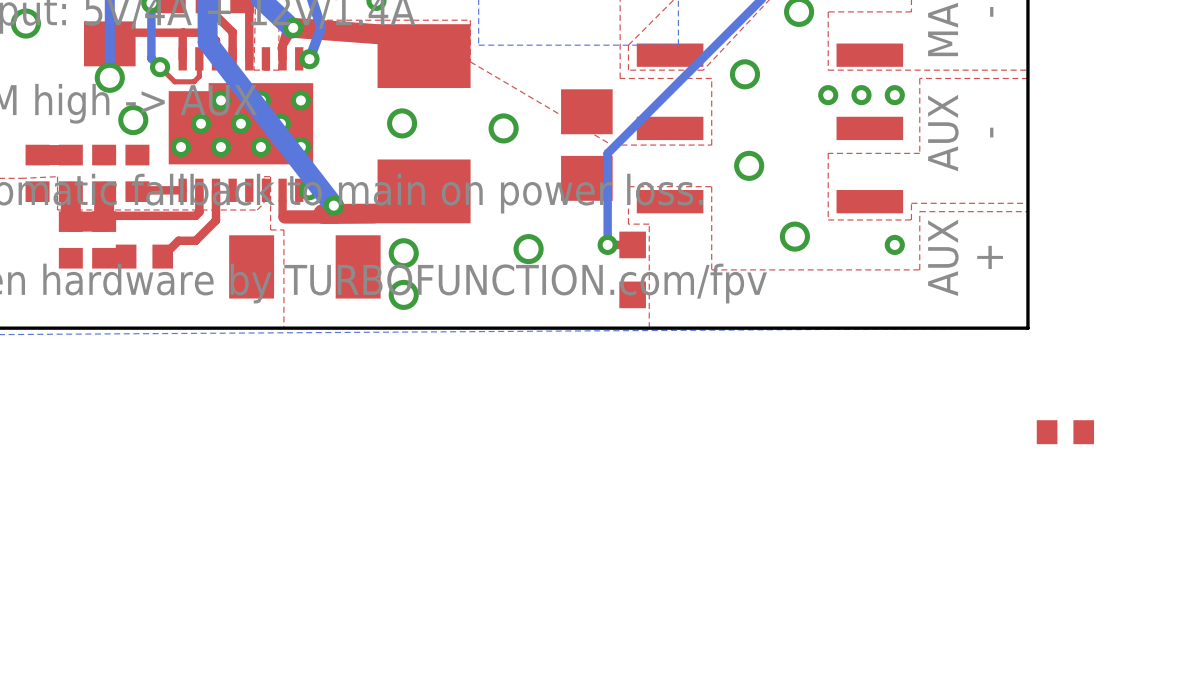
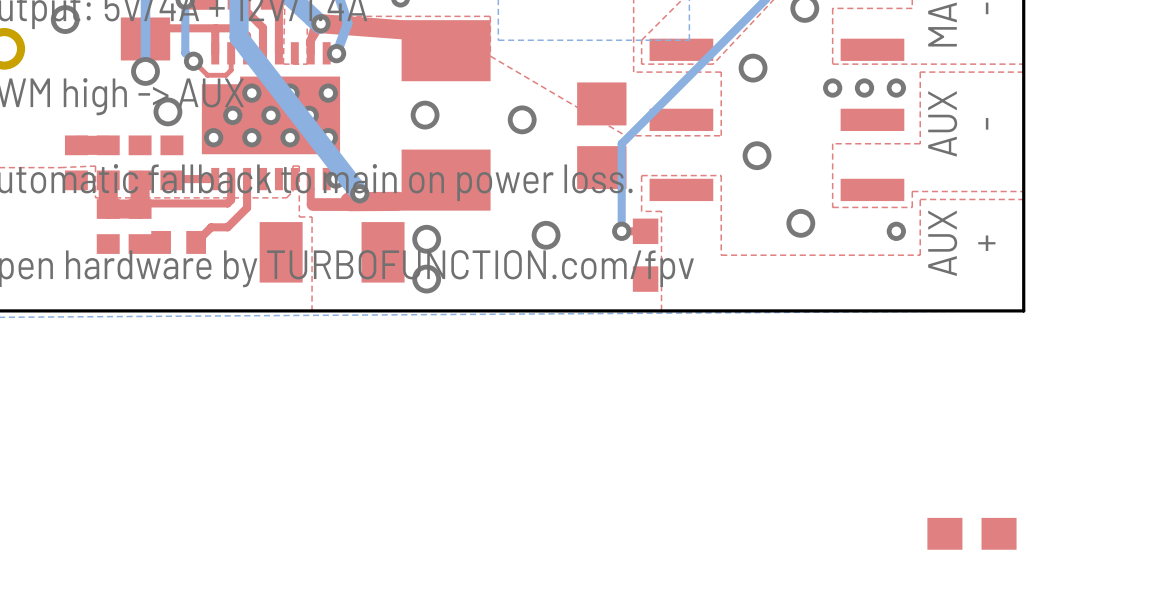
part: (1065, 432) -> none
part: none -> (971, 533)

